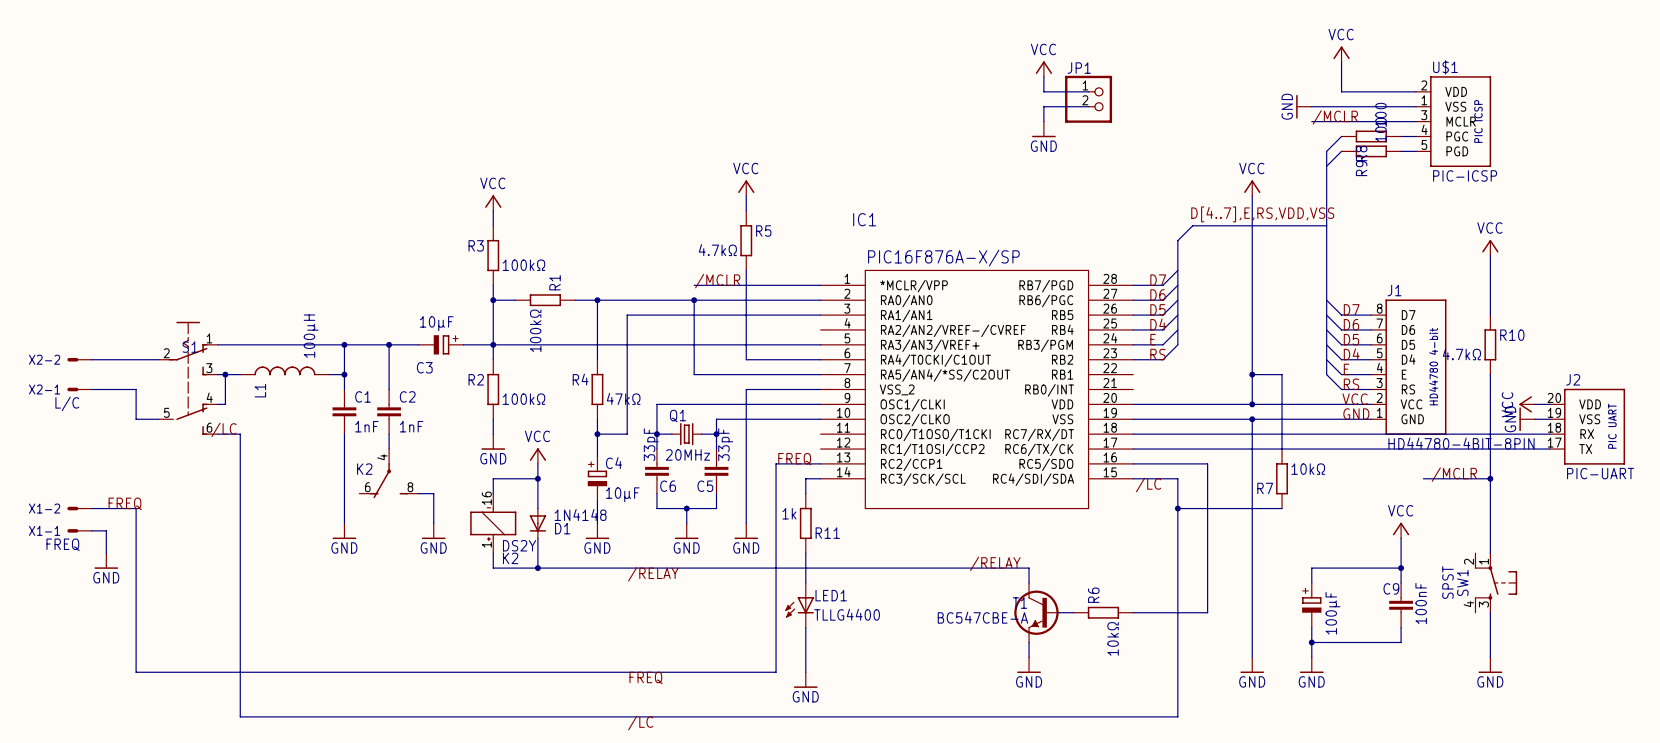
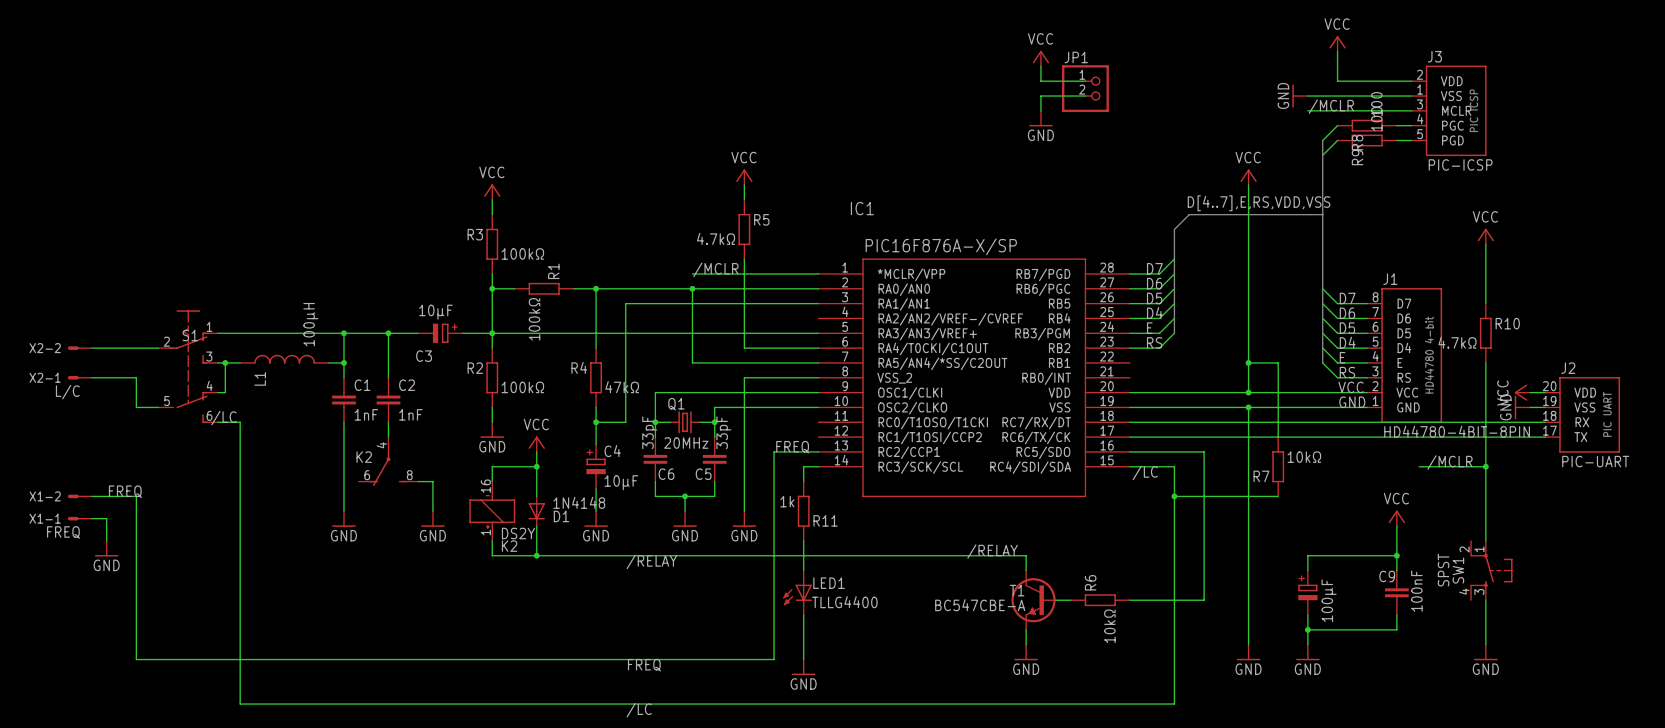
U$1 name: U$1 (1445, 67) -> J3 (1434, 56)

